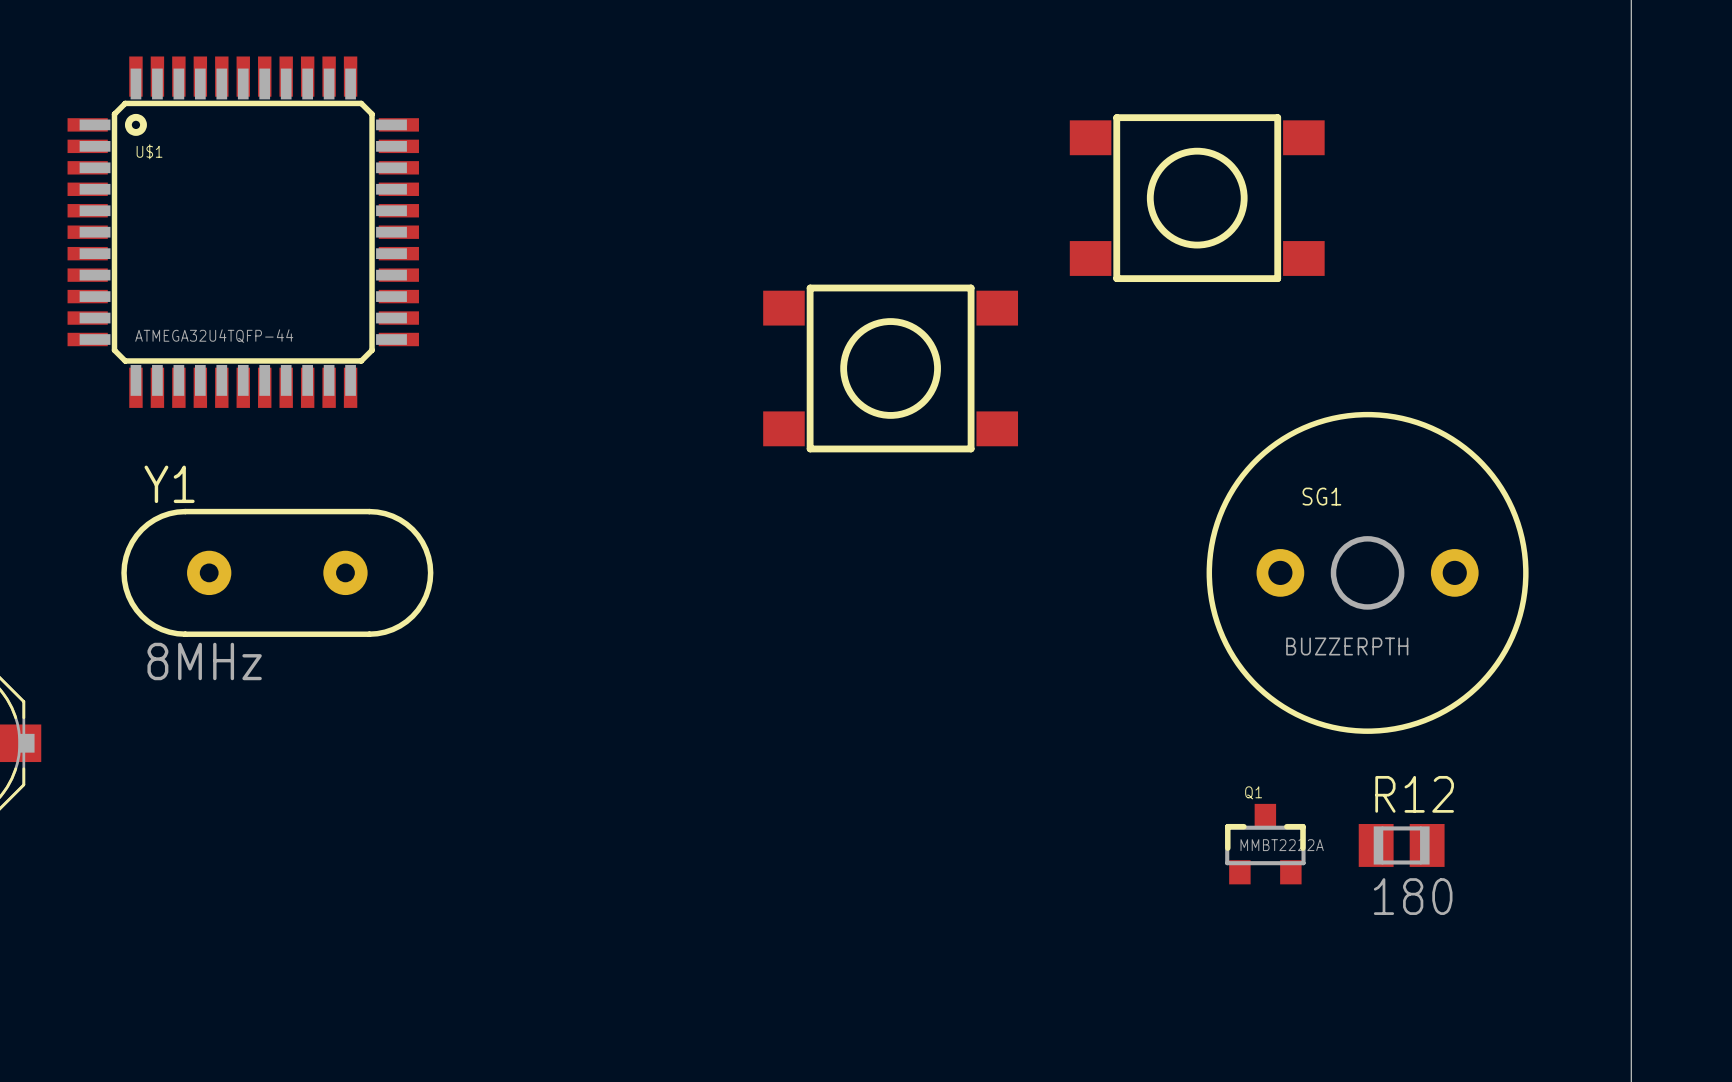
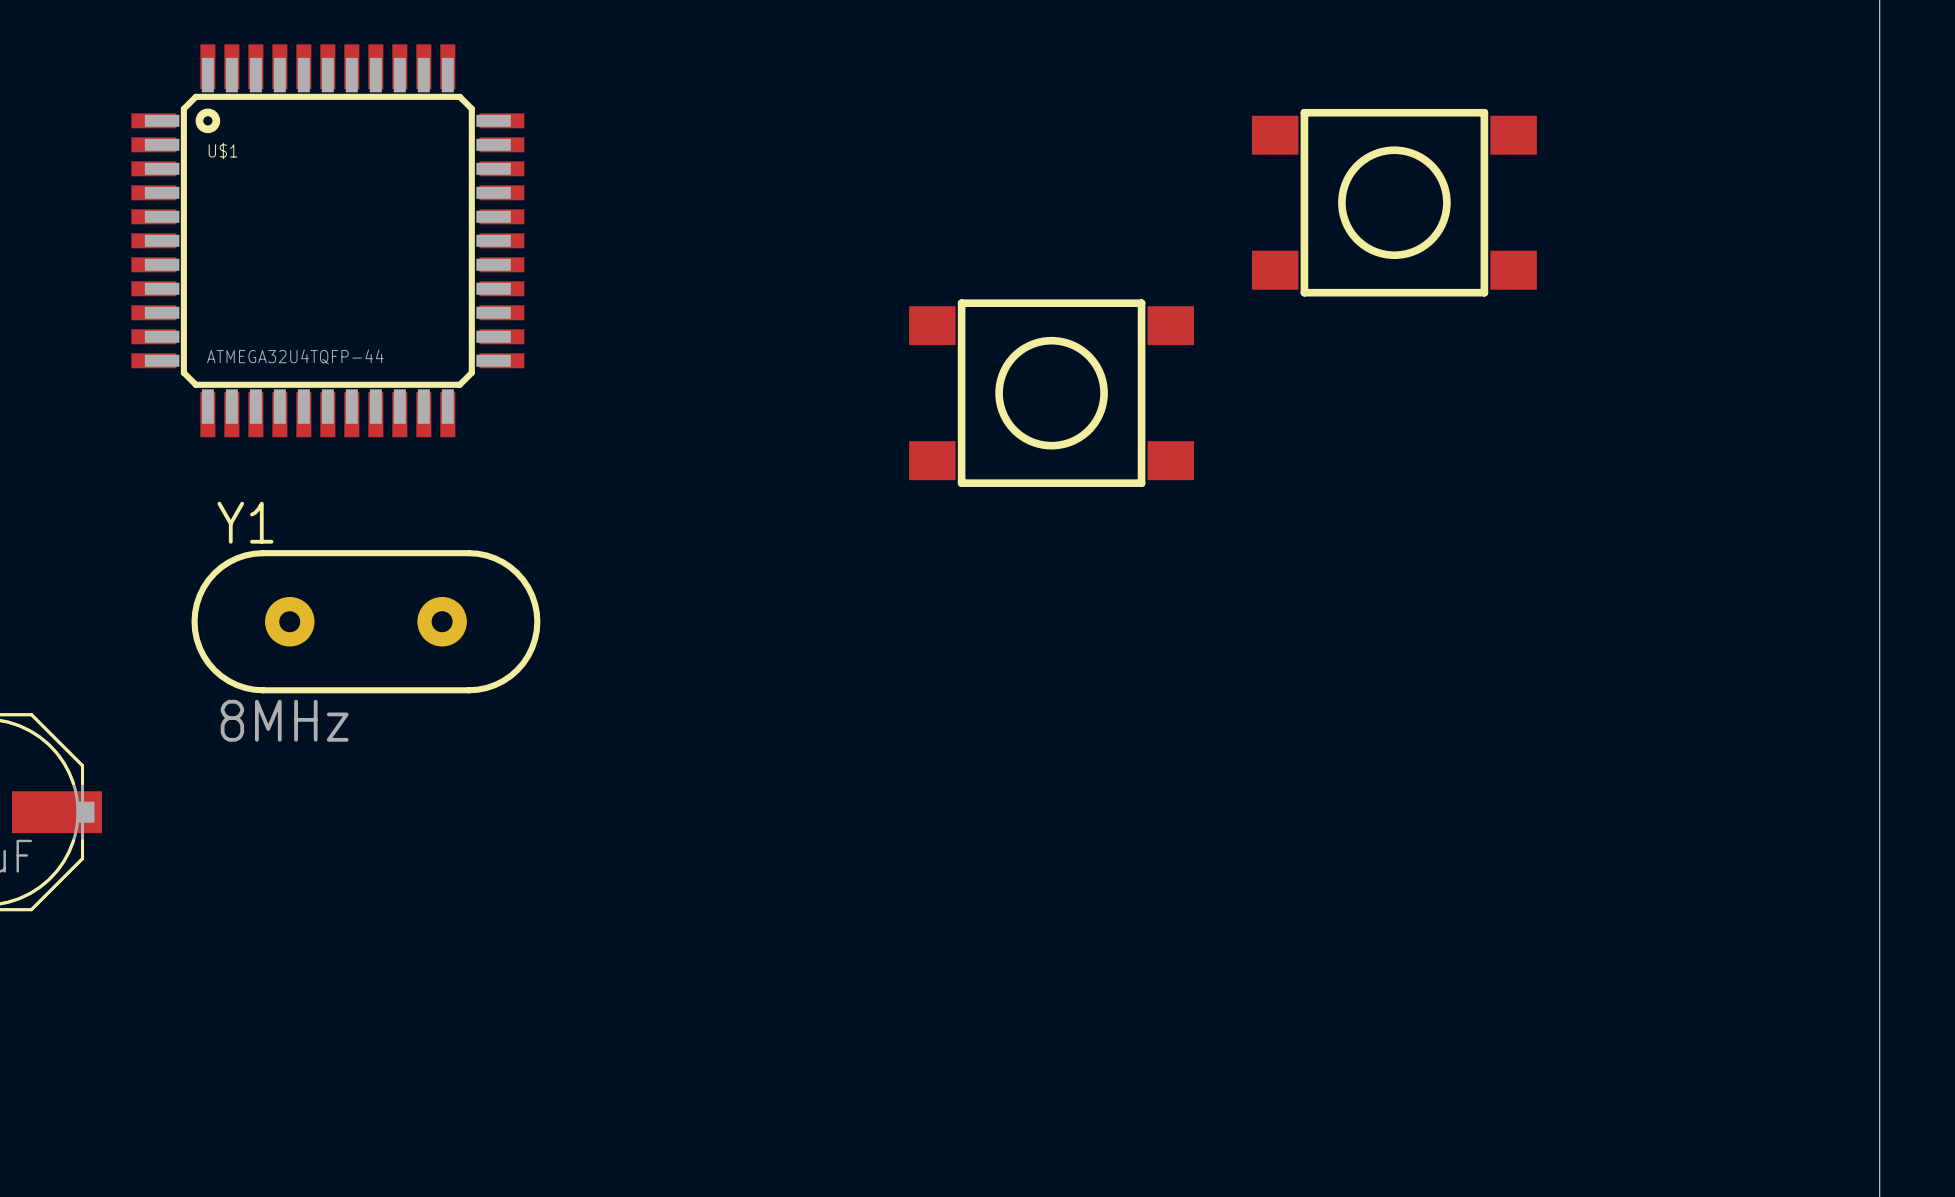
SG1: BUZZERPTH (1367, 572) -> none
Q1: MMBT2222A (1265, 844) -> none
R12: 180 (1401, 845) -> none

